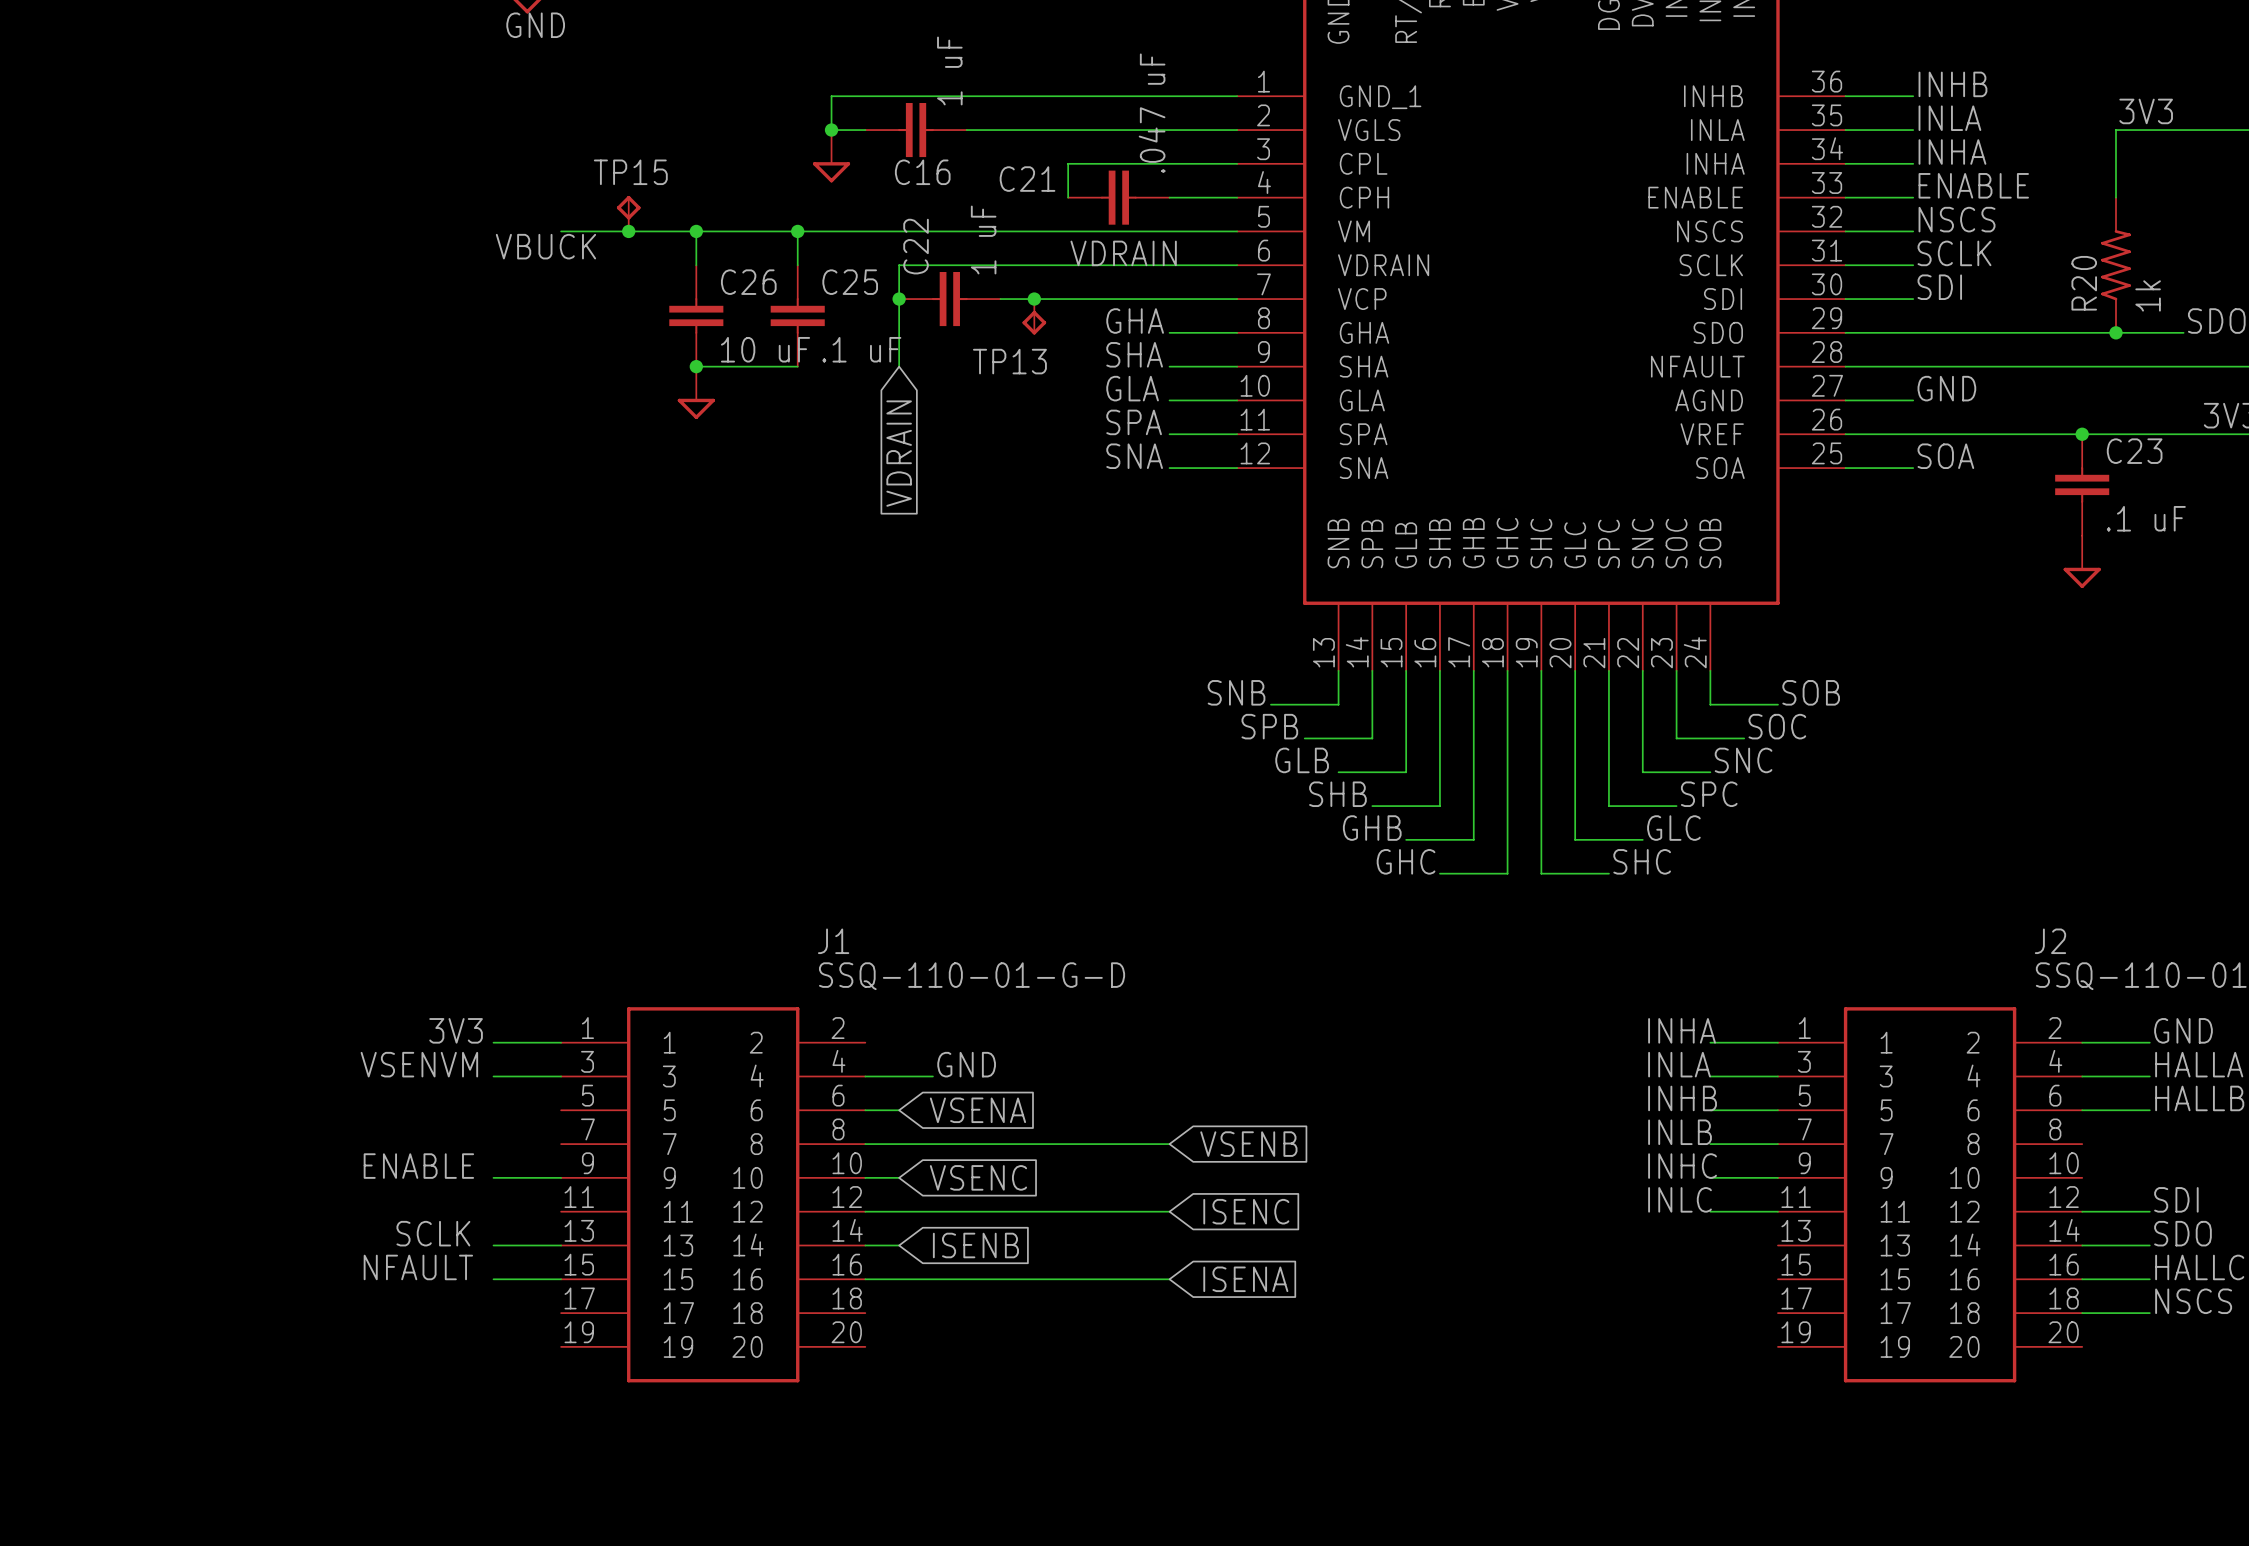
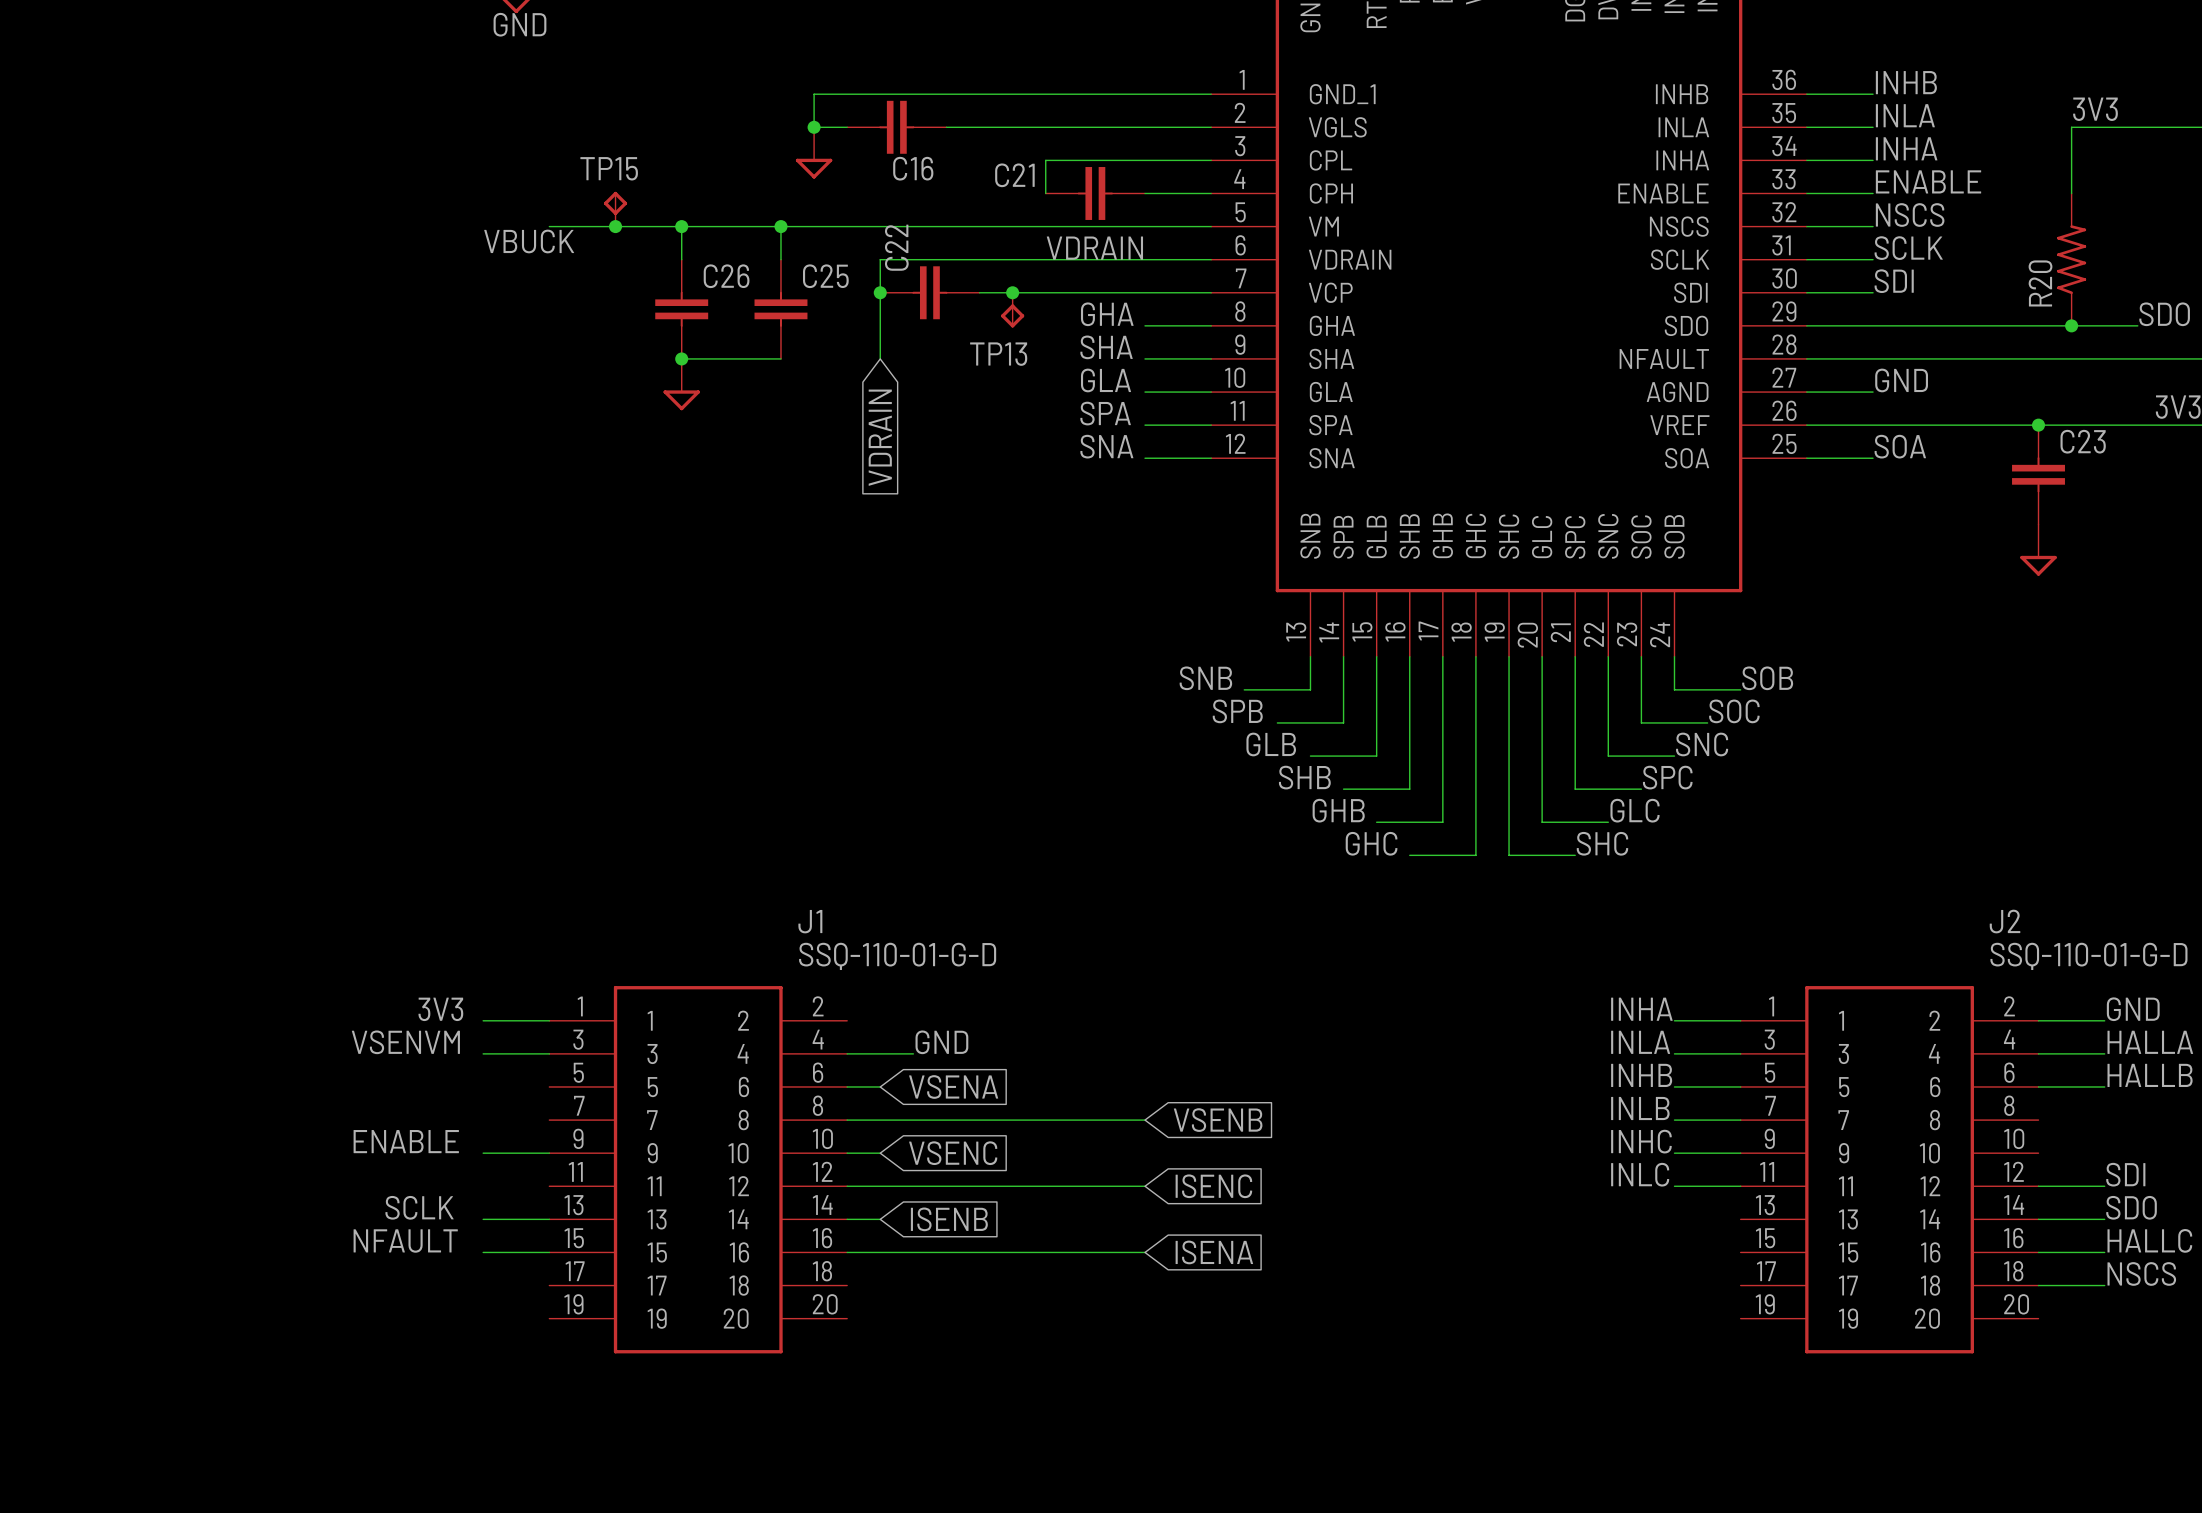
C16 value: 1 uF (949, 70) -> none
C21 value: .047 uF (1152, 113) -> none
C22 value: 1 uF (983, 240) -> none
R20 value: 1k (2148, 295) -> none
C26 value: 10 uF (765, 349) -> none
C25 value: .1 uF (861, 349) -> none
C23 value: .1 uF (2146, 518) -> none

